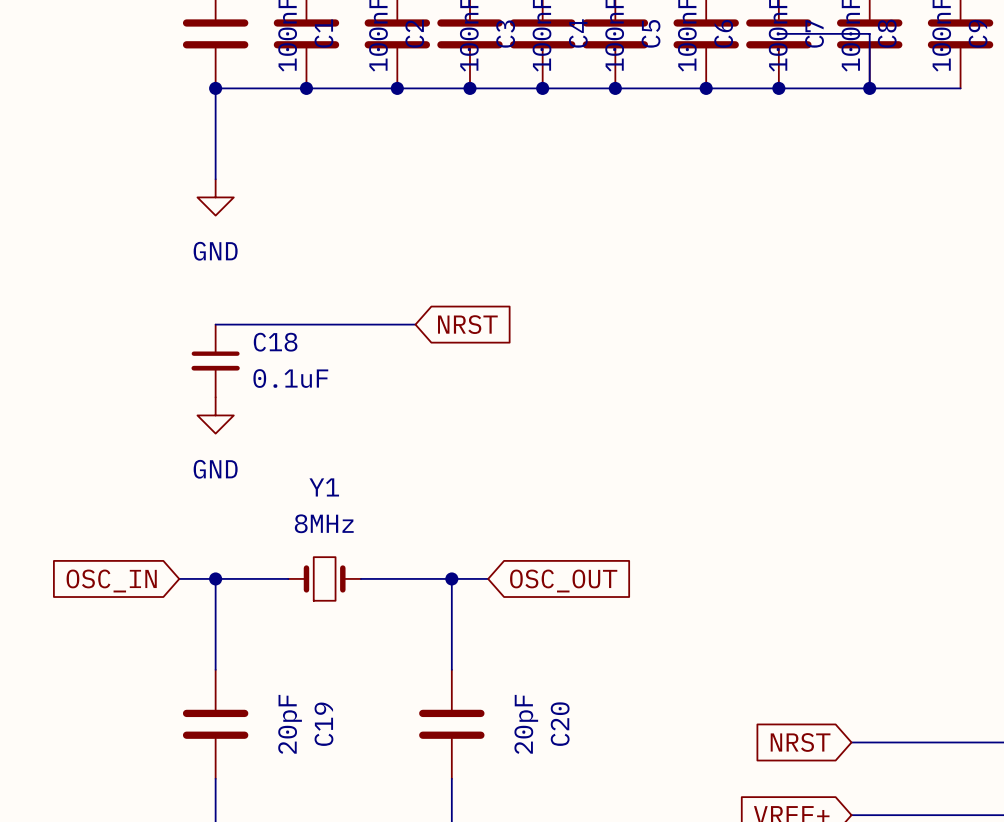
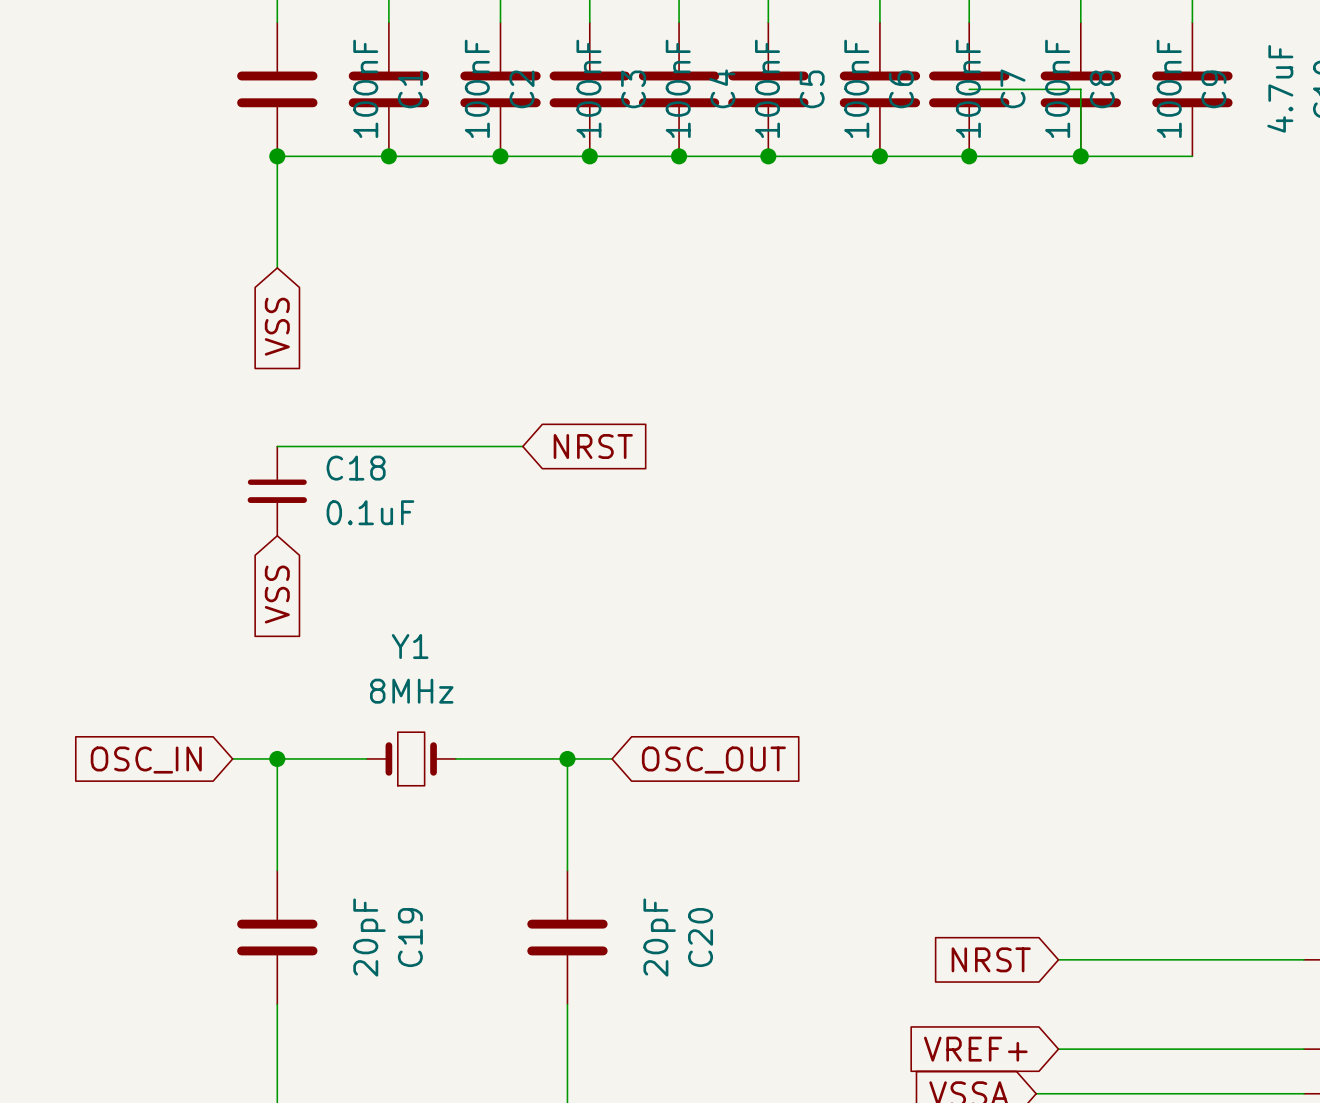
power symbol: GND (215, 197) -> none
global label: none -> VSS (277, 326)
power symbol: GND (215, 415) -> none
global label: none -> VSS (277, 594)

